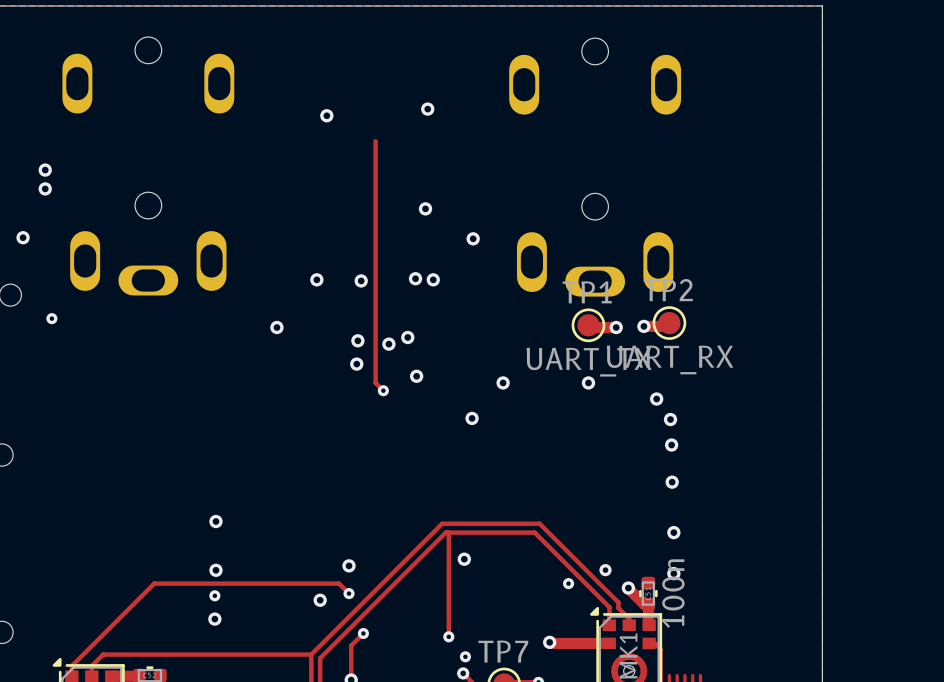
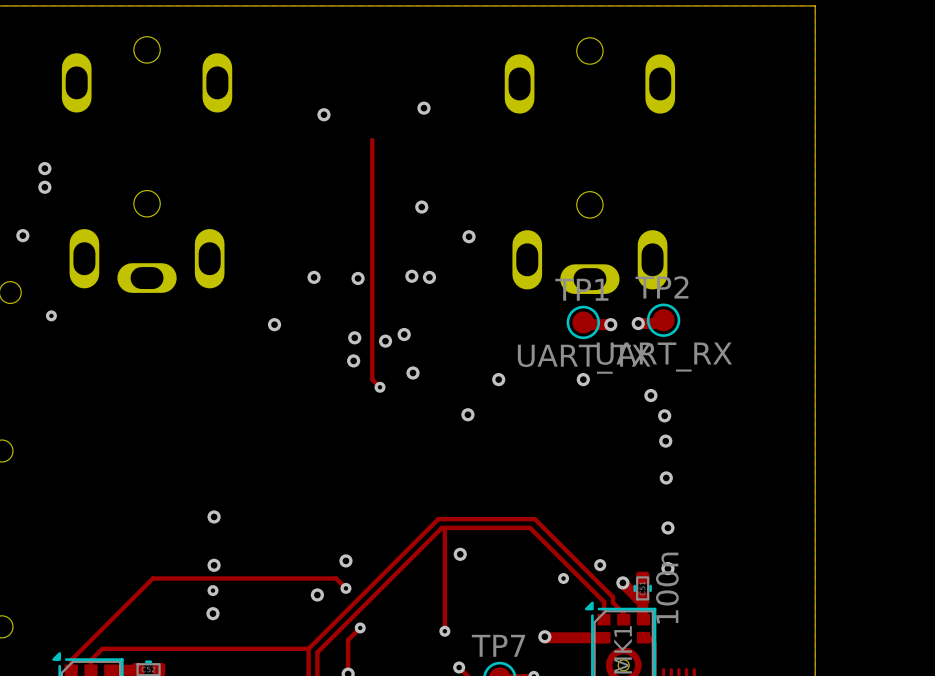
via: (465, 656) -> none

